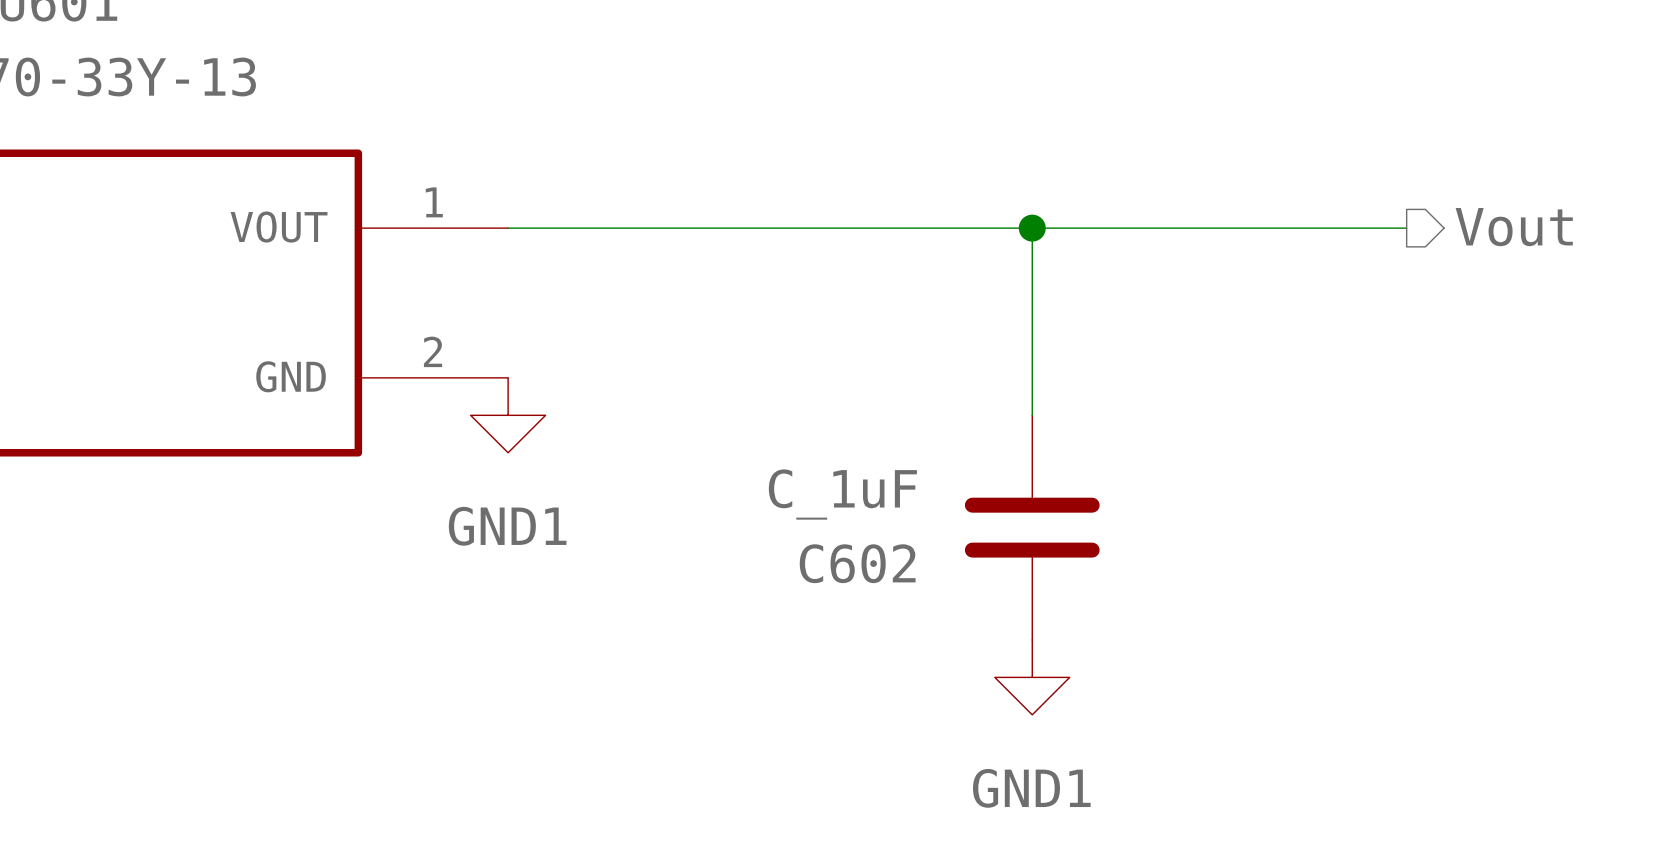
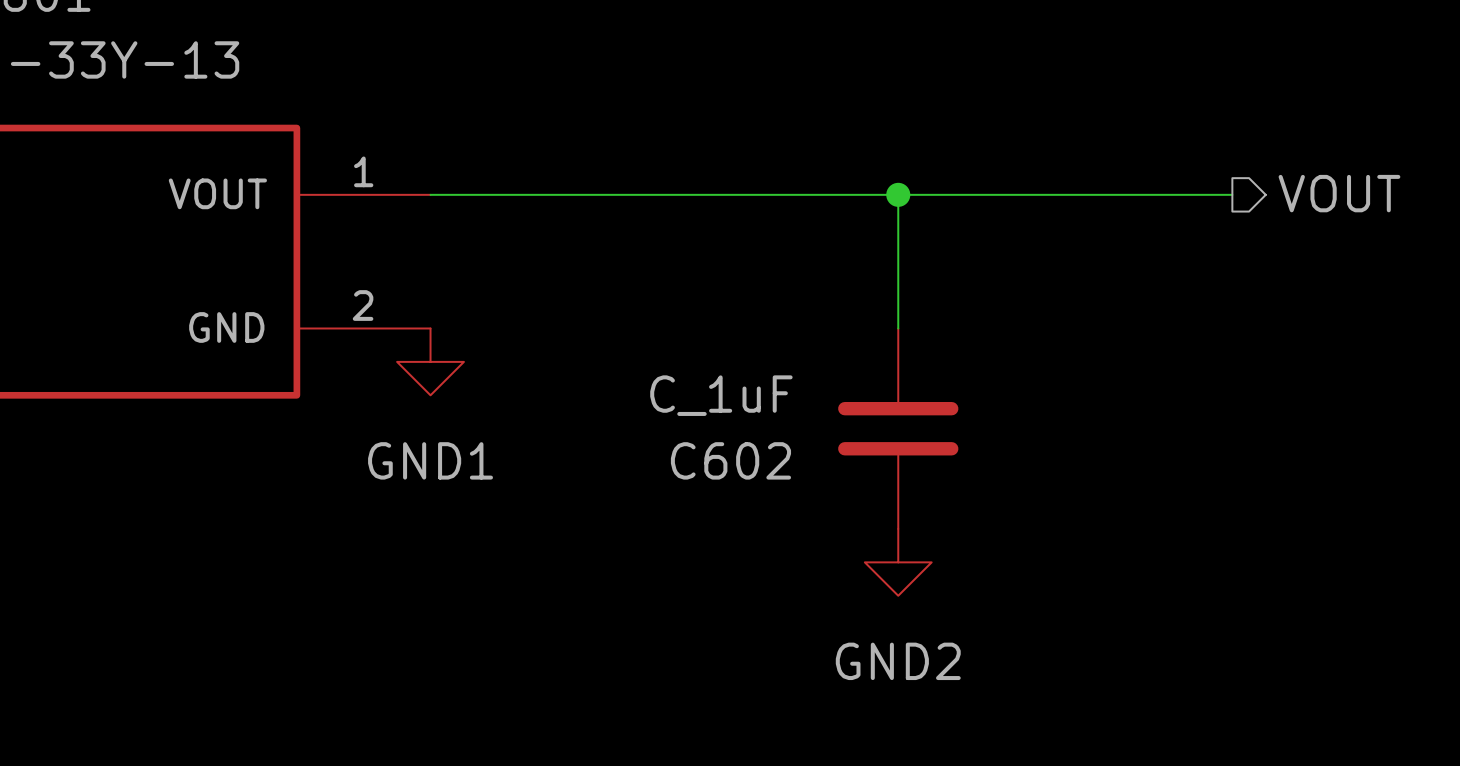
hierarchical label: Vout (1514, 227) -> VOUT (1339, 193)
C602 position: (1032, 527) -> (898, 428)
power symbol: none -> GND2 (898, 562)
power symbol: GND1 (1032, 677) -> none

